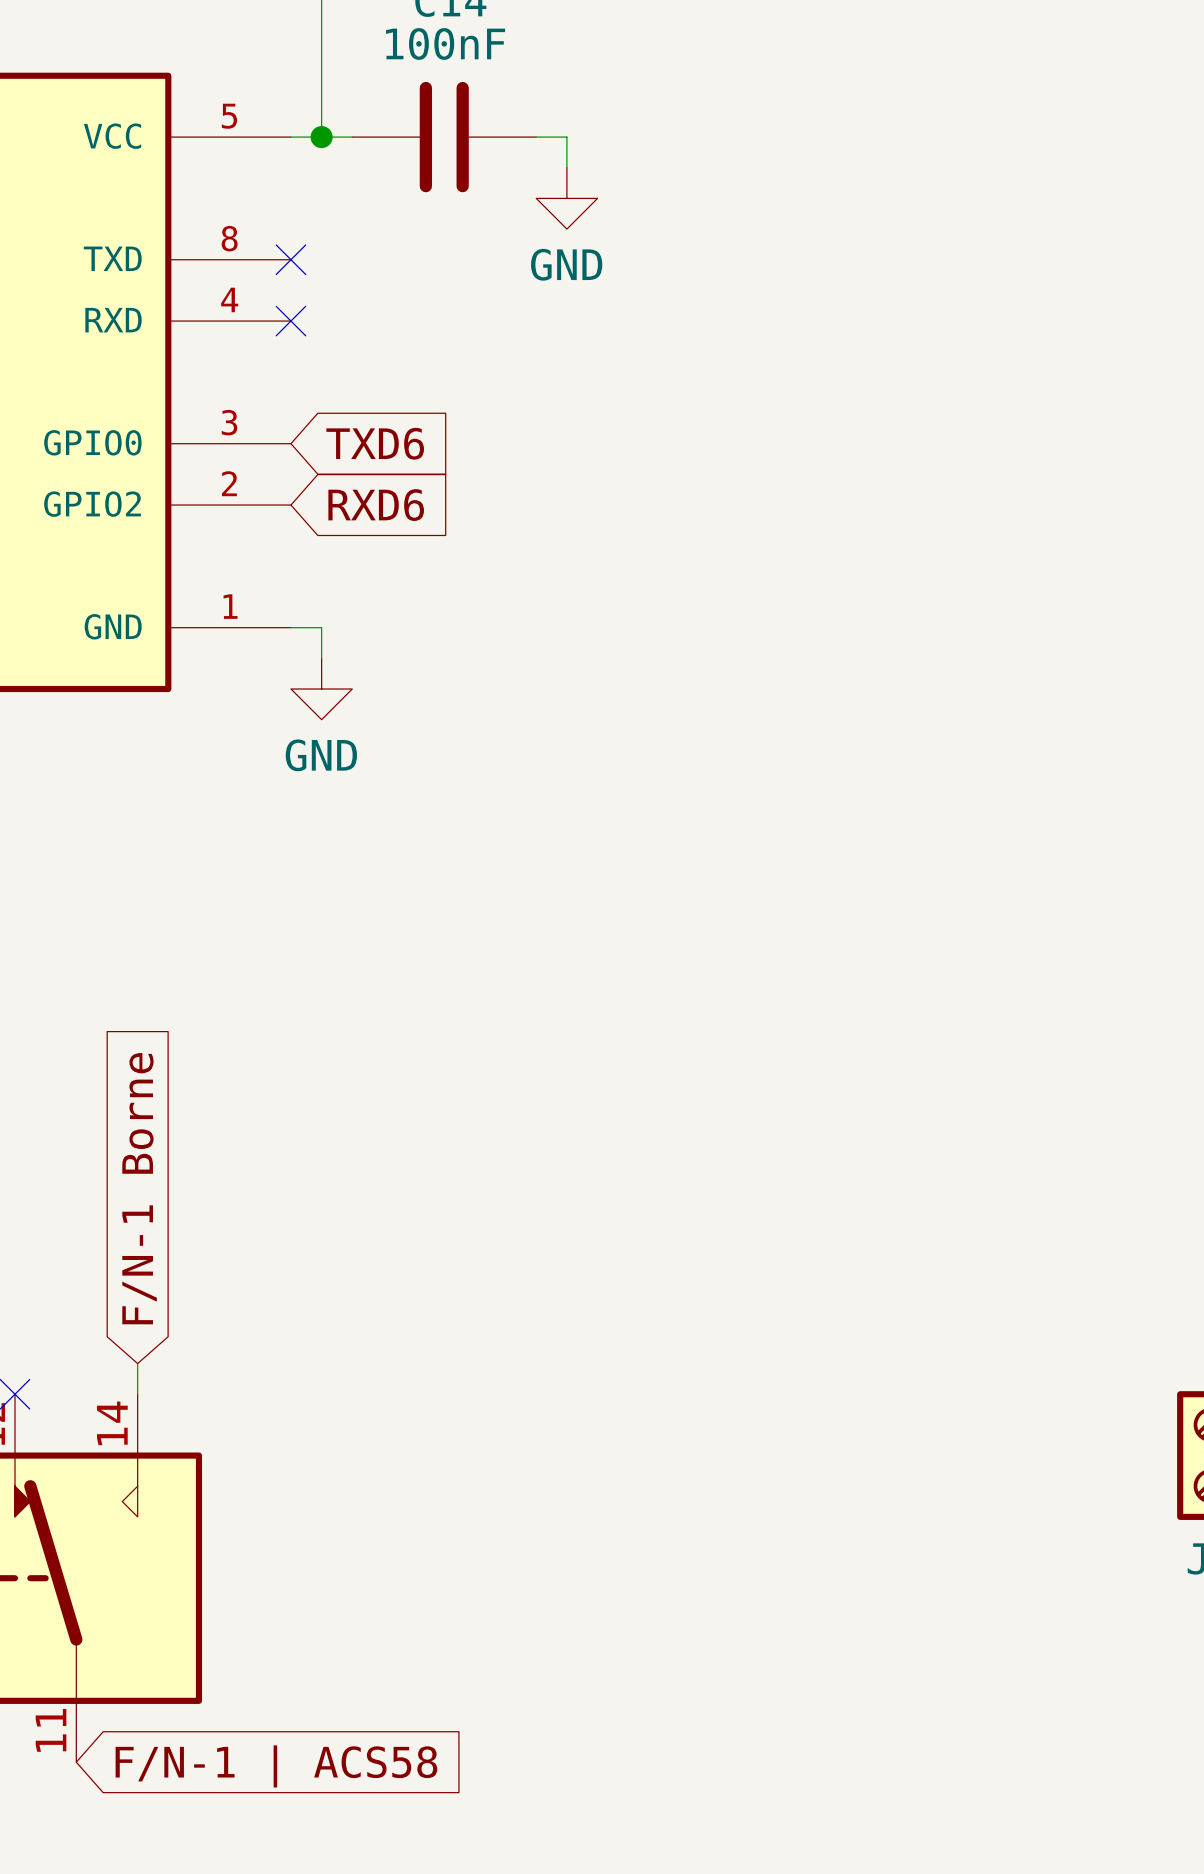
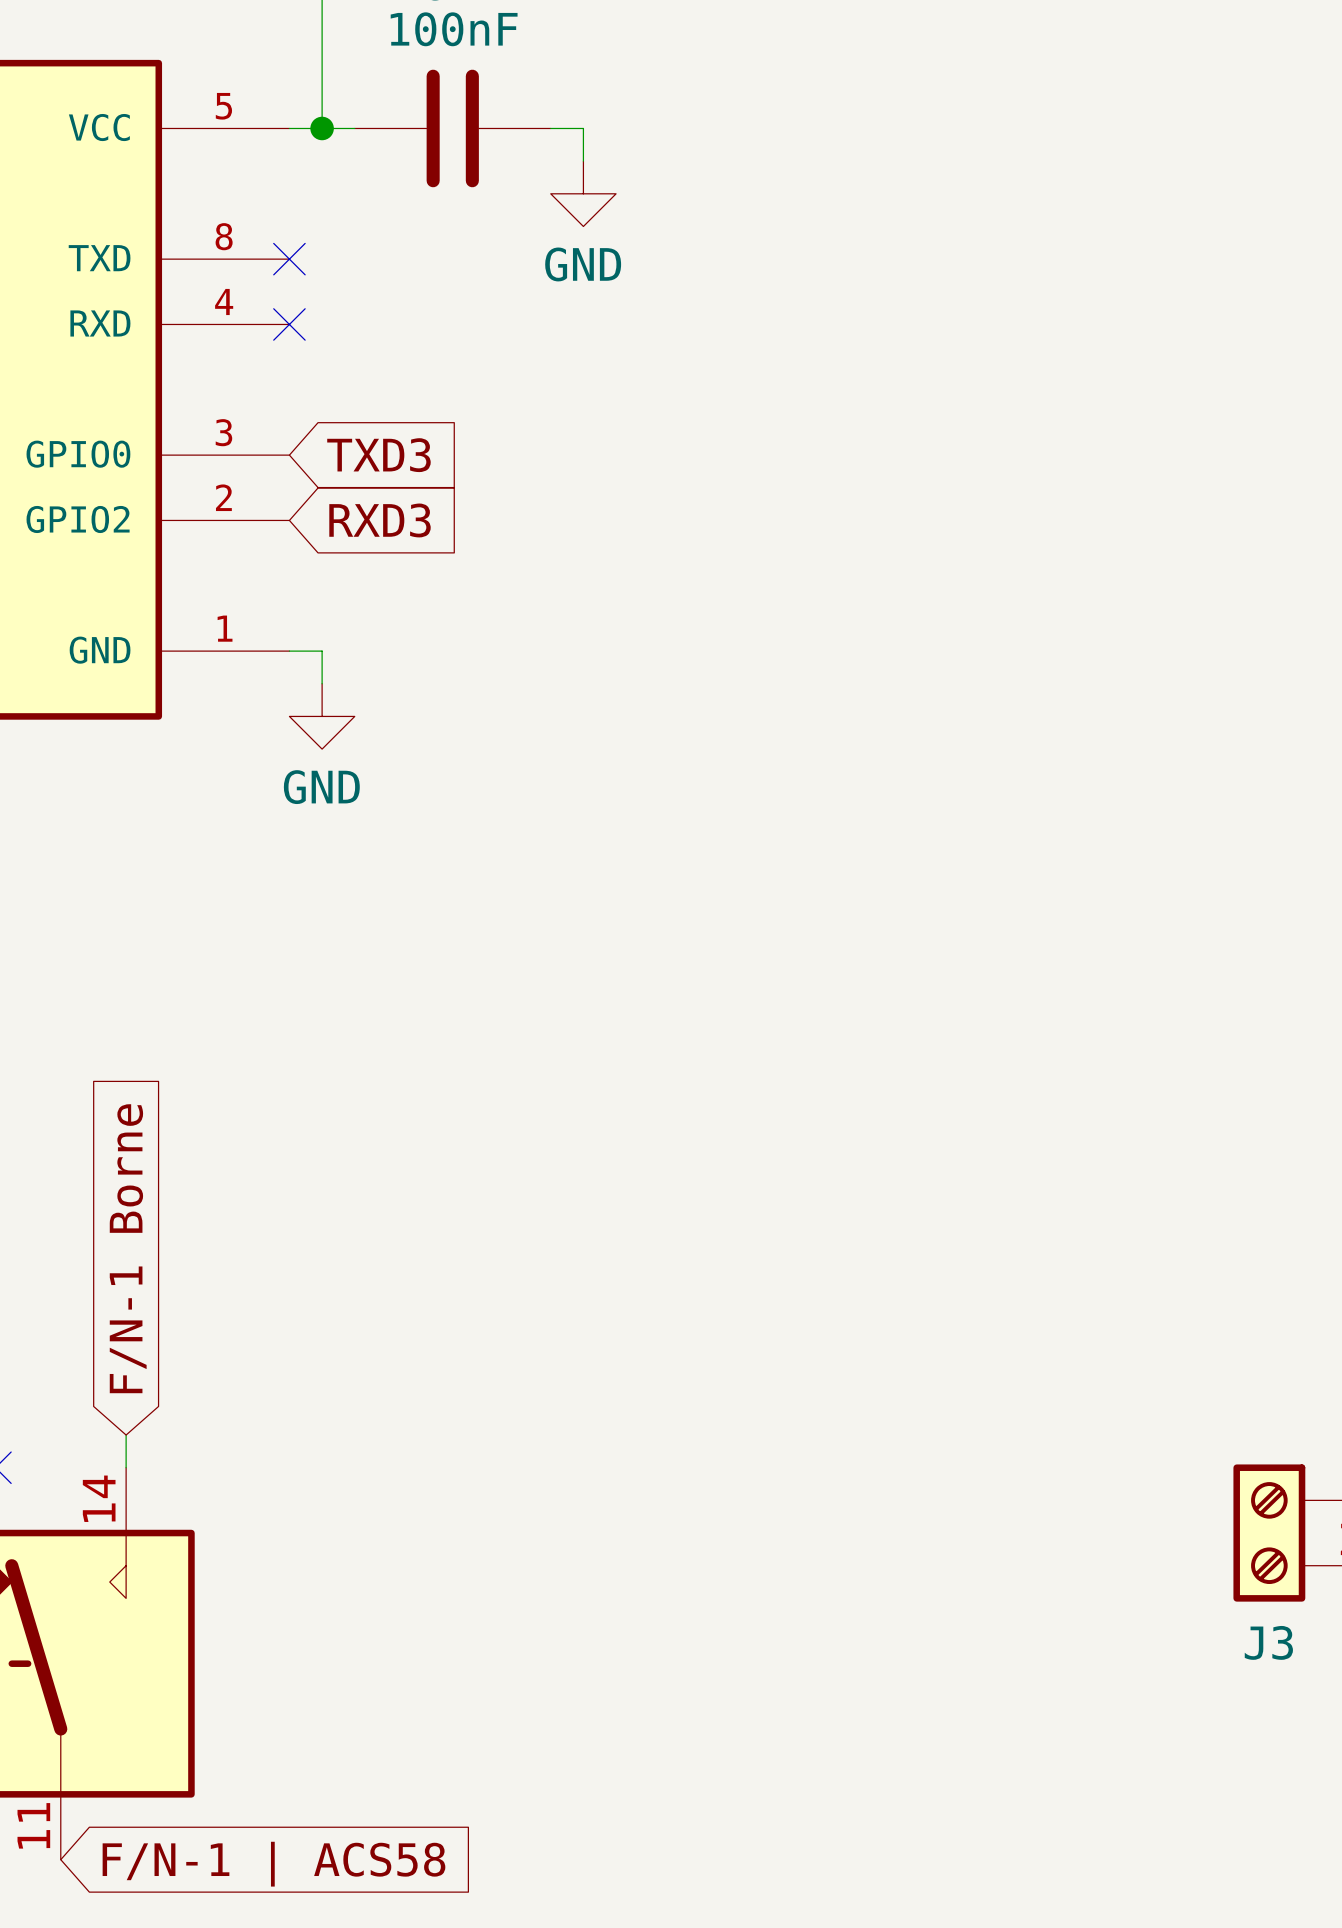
global label: TXD6 (375, 443) -> TXD3 (378, 455)
global label: RXD6 (376, 505) -> RXD3 (380, 520)

